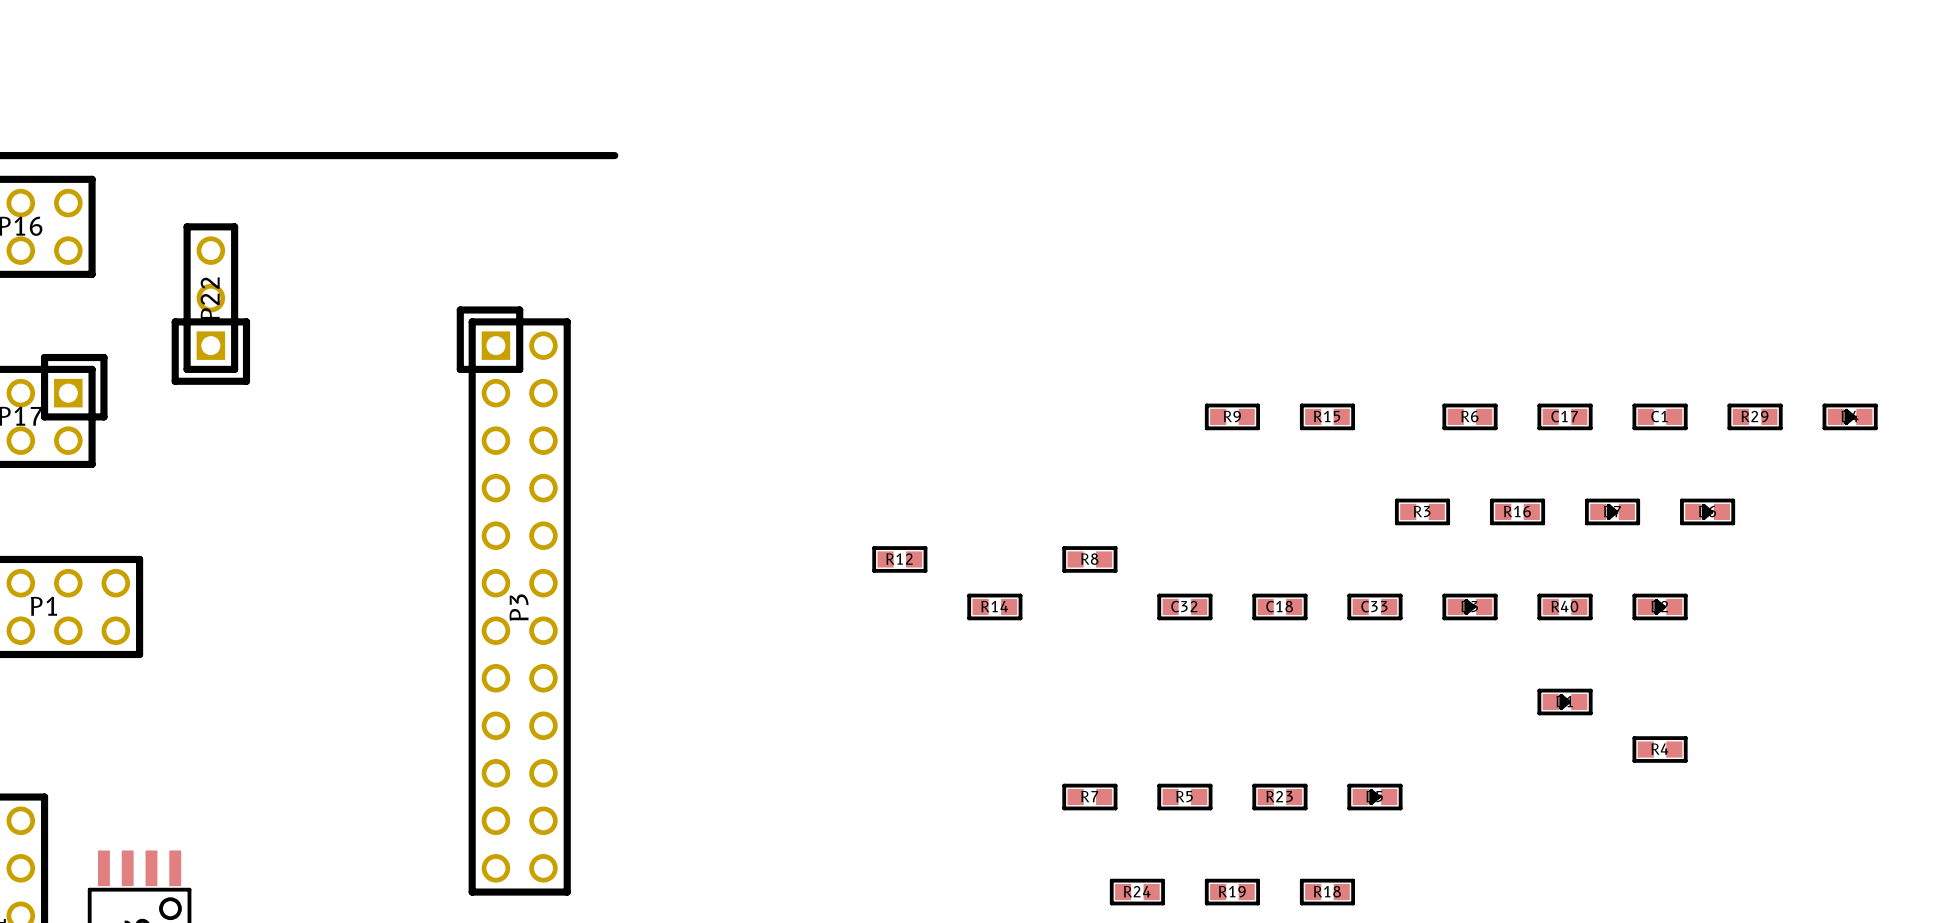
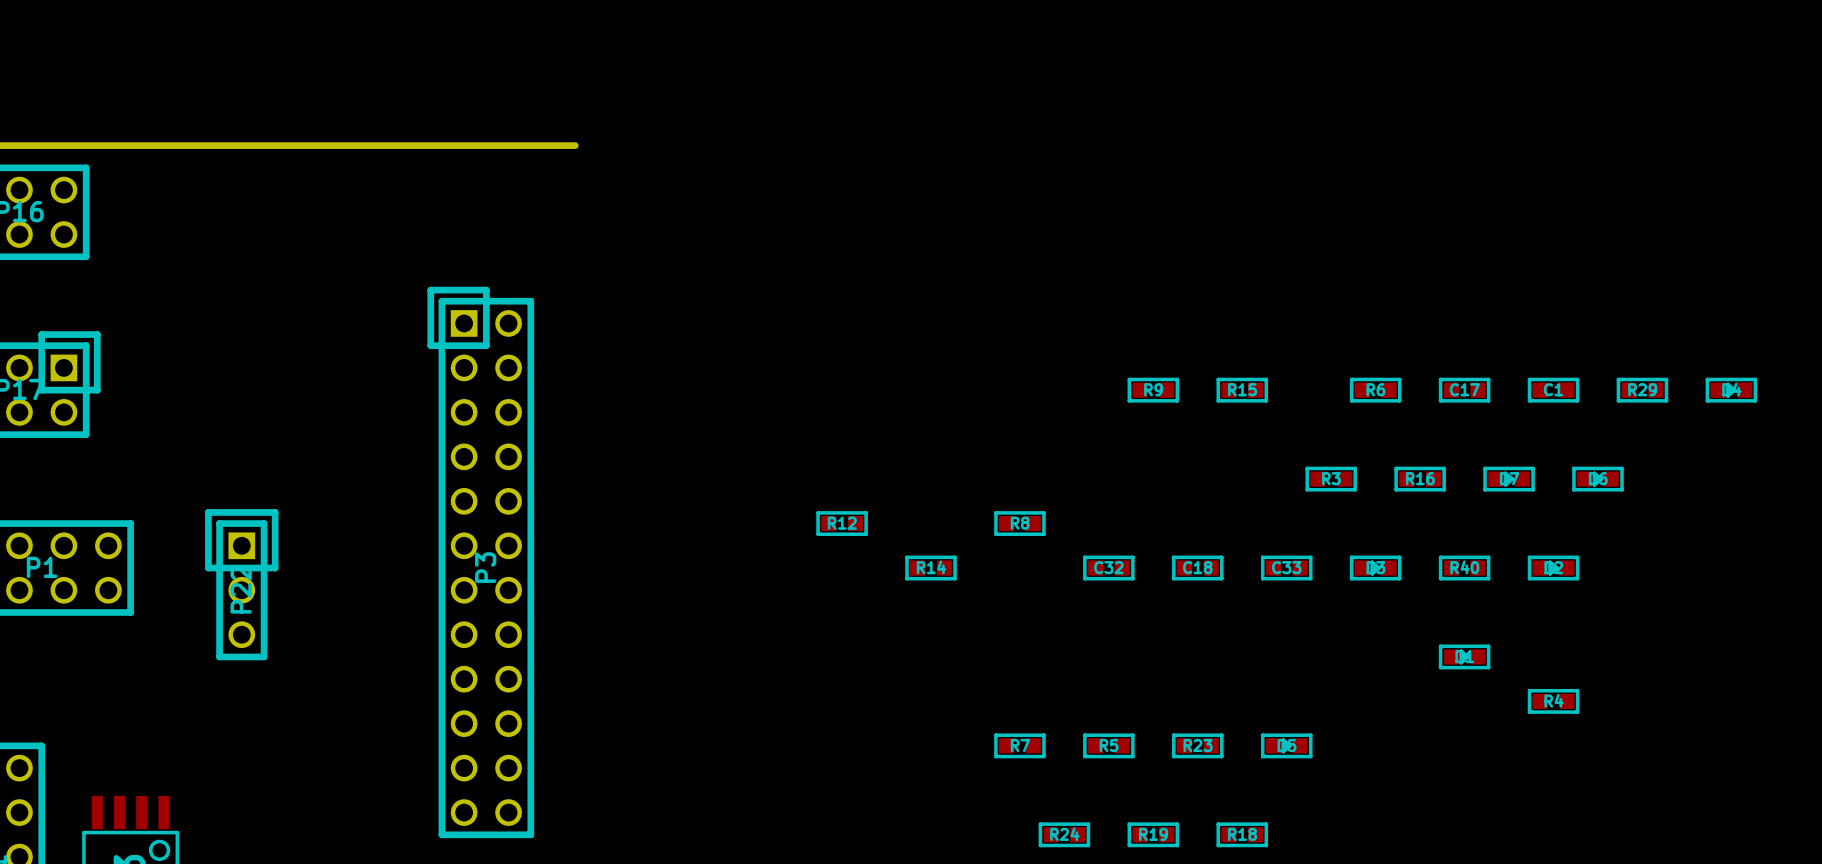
P22 rotation: 0° (210, 304) -> 180° (241, 584)
P22 position: (210, 304) -> (241, 584)

